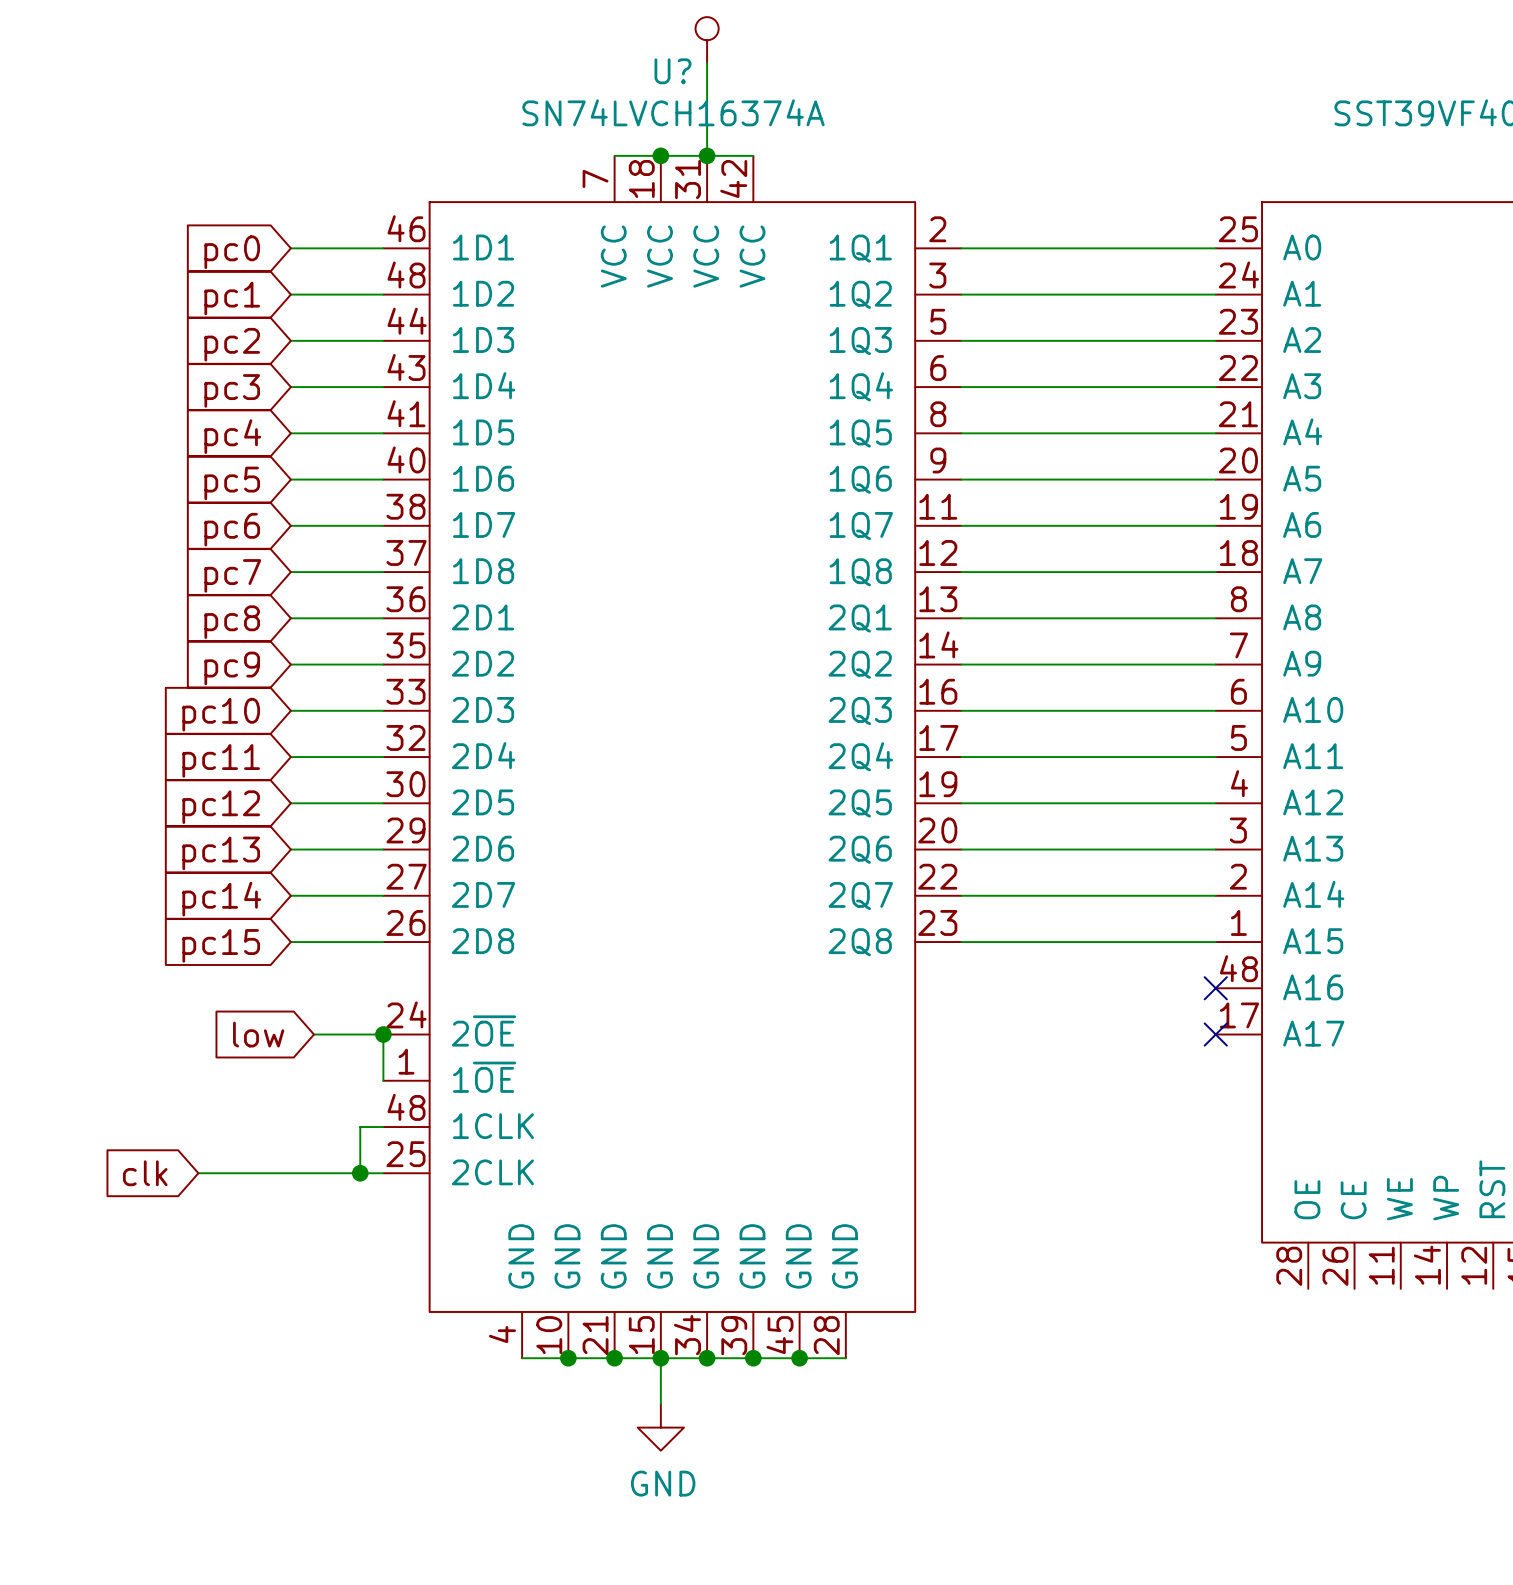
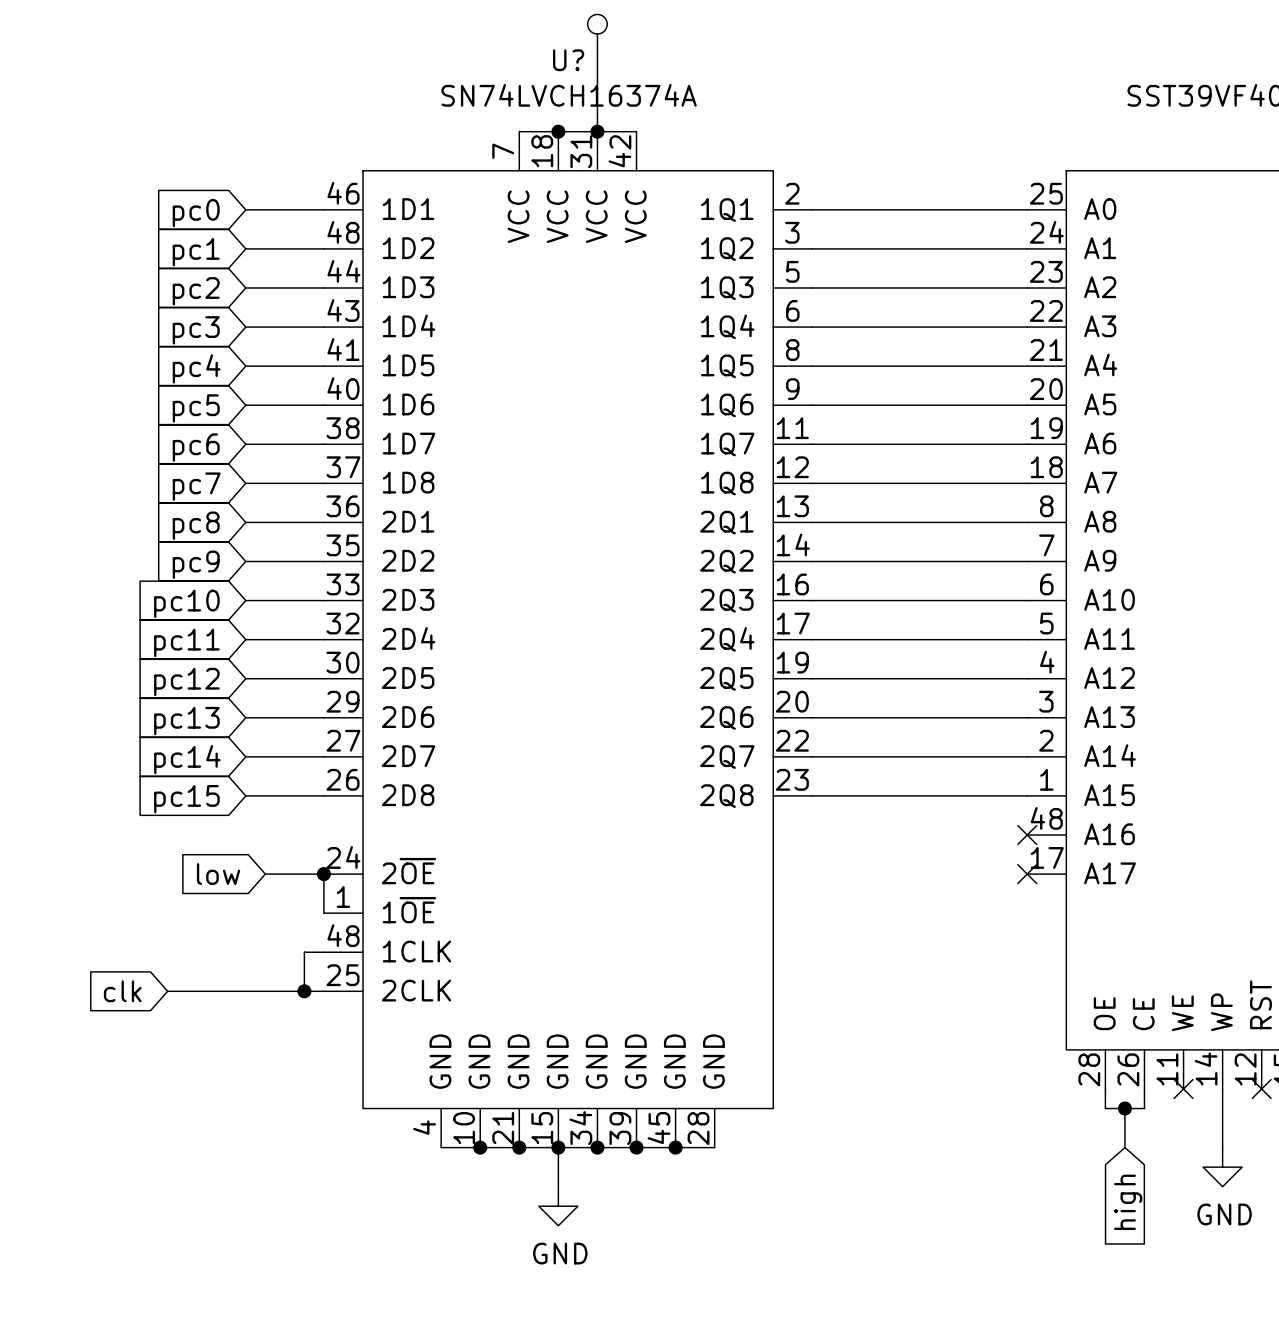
wire: none -> (1105, 1088) (1105, 1108) (1144, 1108) (1144, 1088)
no-connect mark: none -> (1183, 1088)
wire: none -> (1222, 1088) (1222, 1147)
no-connect mark: none -> (1261, 1088)
wire: none -> (1124, 1108) (1124, 1147)
junction: none -> (1124, 1108)
power symbol: none -> GND (1222, 1167)
global label: none -> high (1128, 1202)

